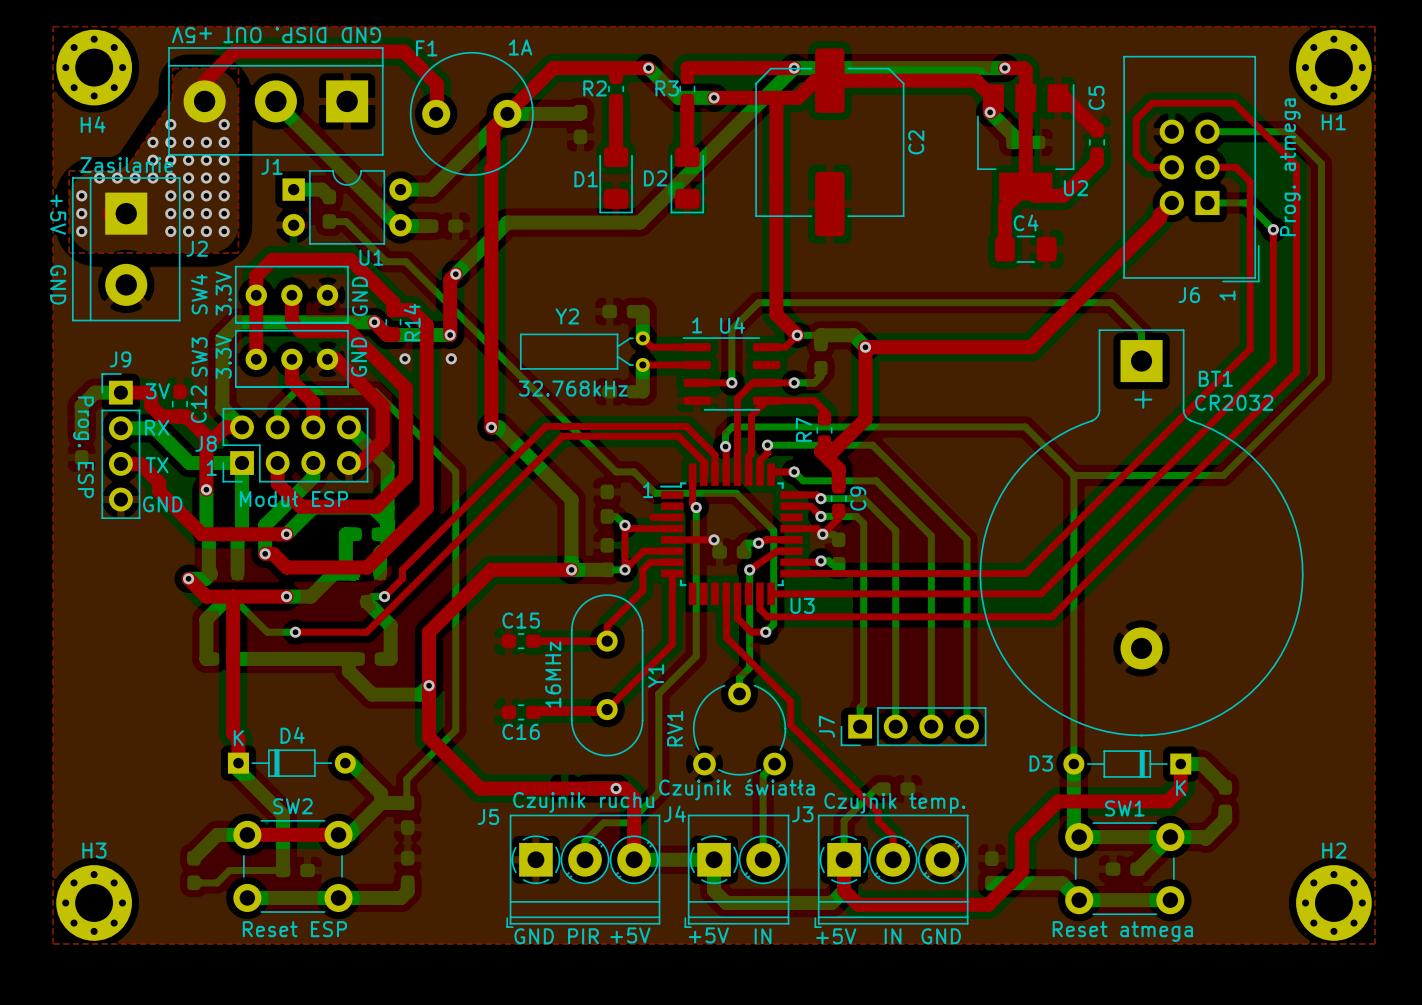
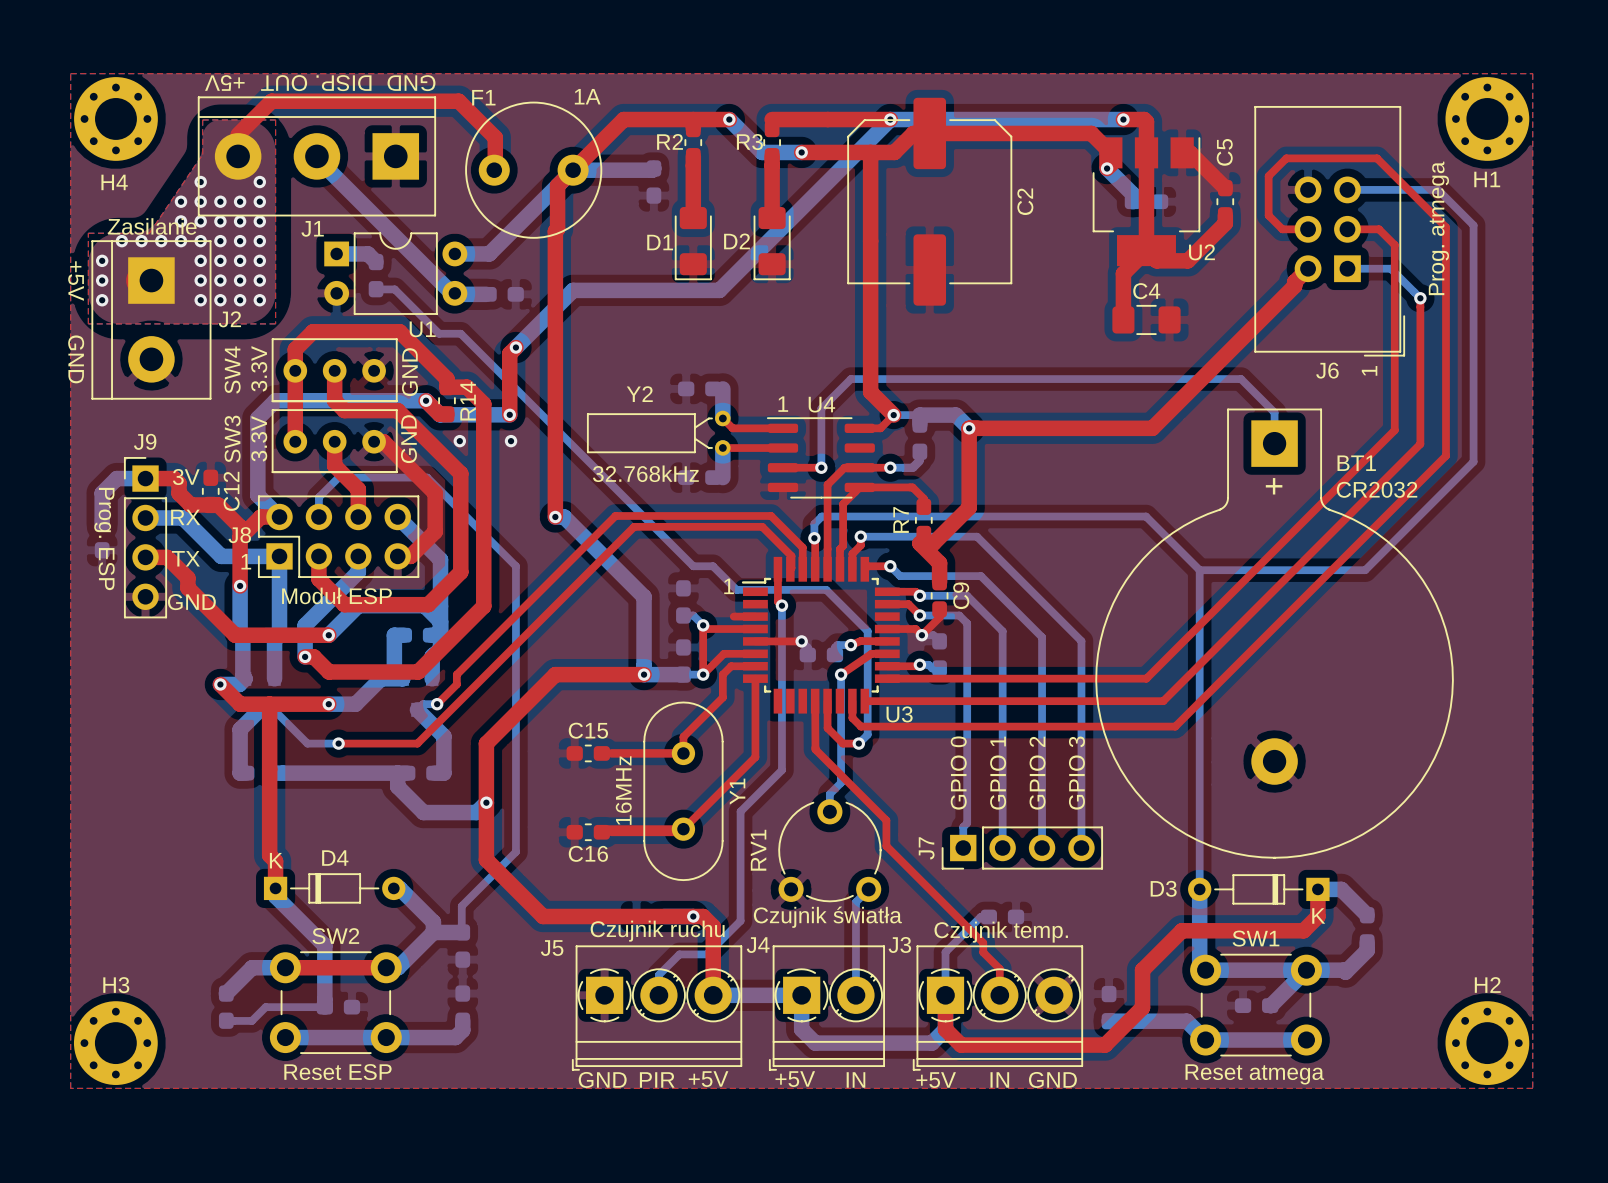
text: none -> GPIO 0 (958, 773)
text: none -> GPIO 1 (998, 773)
text: none -> GPIO 2 (1037, 773)
text: none -> GPIO 3 (1076, 773)

